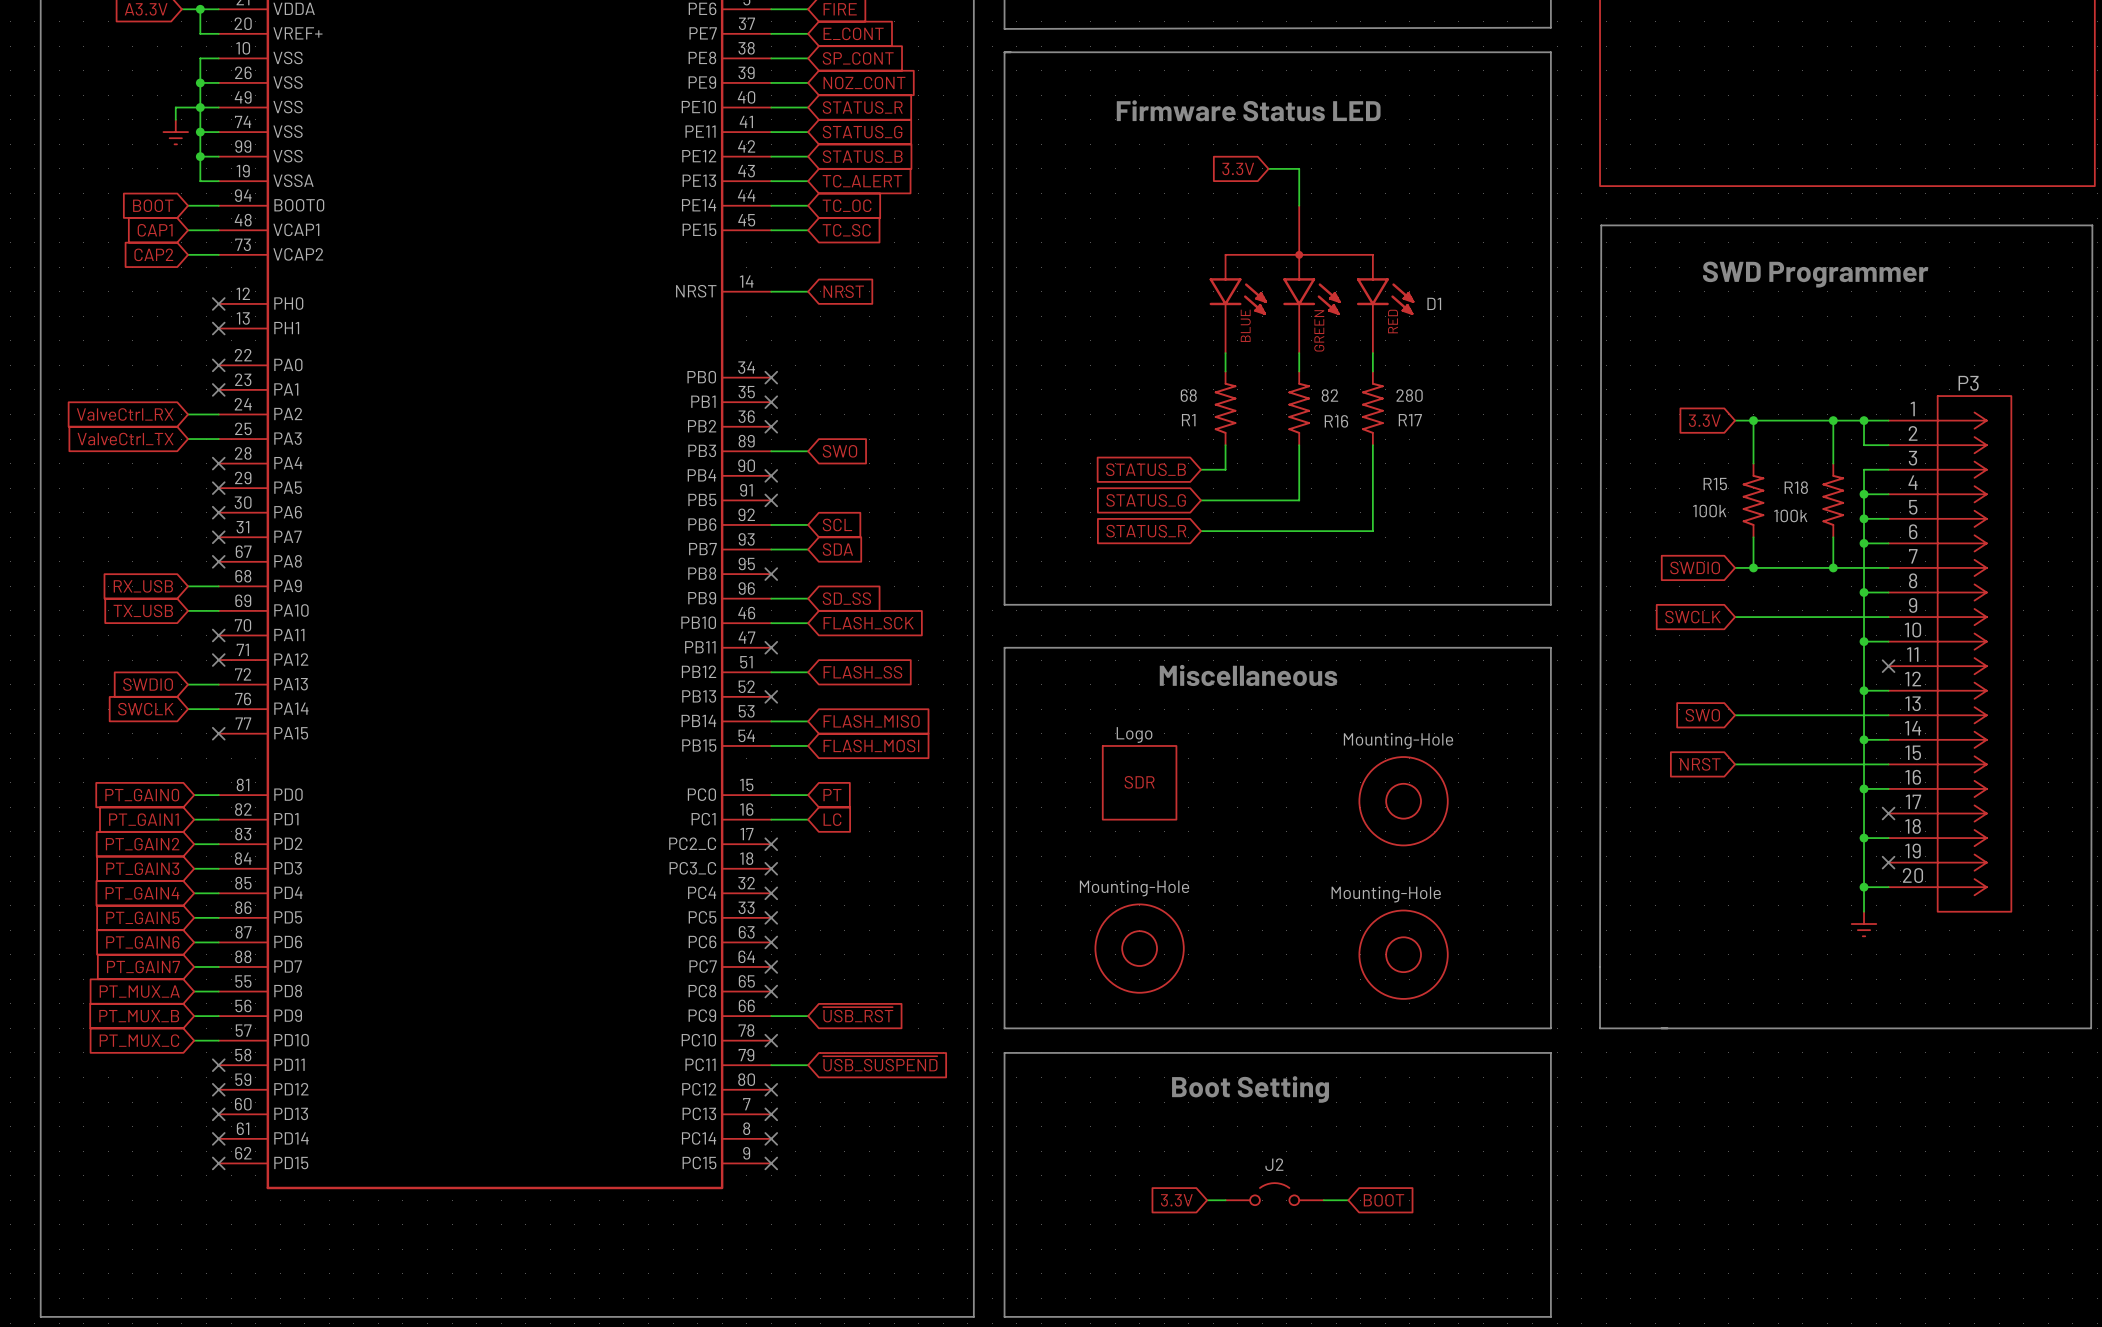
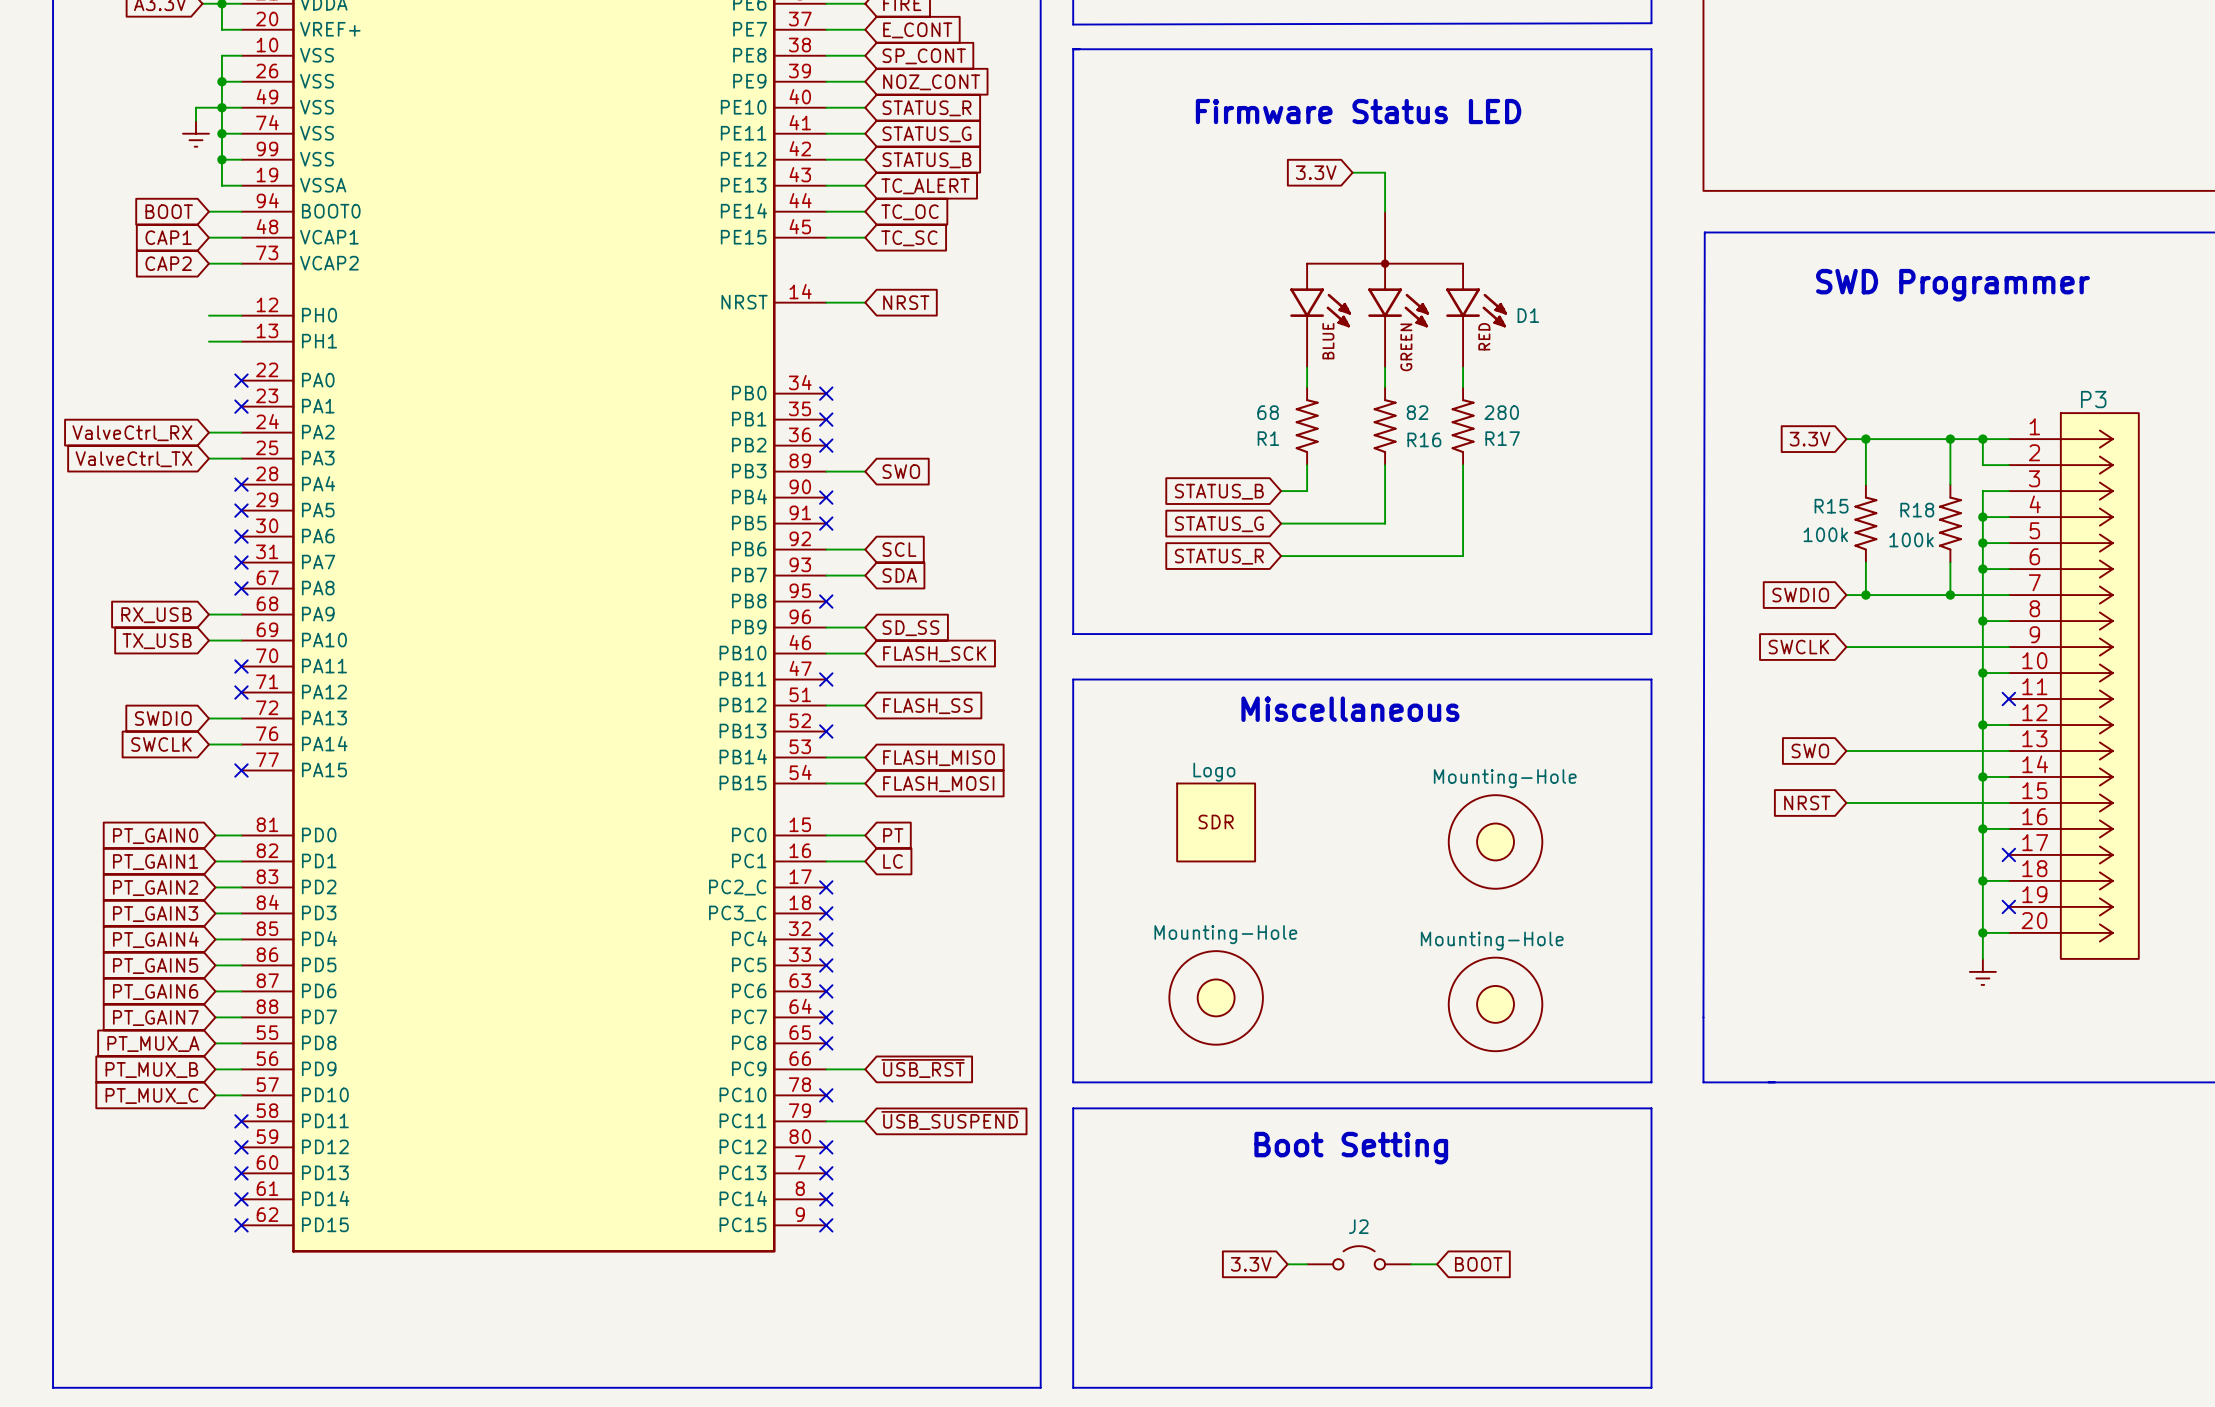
wire: none -> (208, 315) (241, 315)
no-connect mark: (218, 303) -> none
wire: none -> (208, 341) (241, 341)
no-connect mark: (218, 328) -> none

